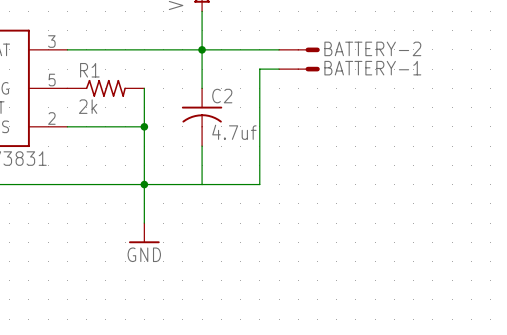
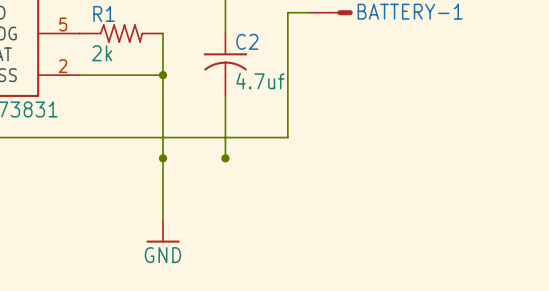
junction position: (144, 184) -> (163, 158)
wire: none -> (225, 137) (225, 158)
junction: none -> (225, 158)
power symbol position: GND (144, 233) -> GND (163, 231)

